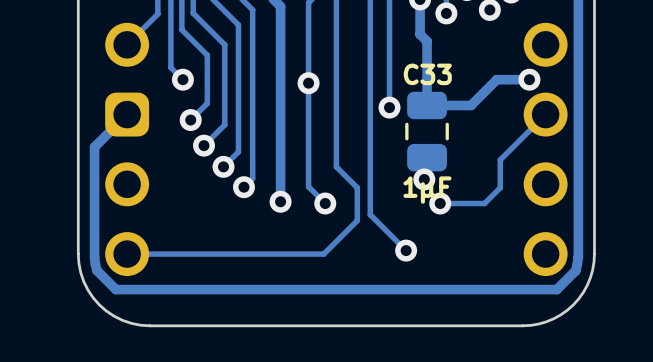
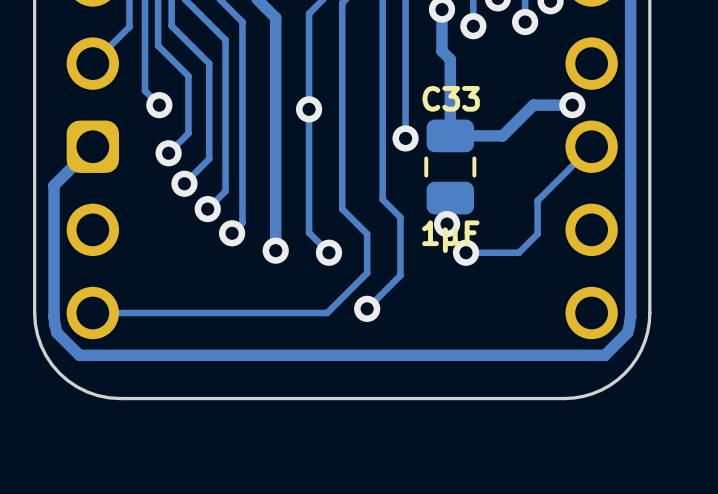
track: (370, 158) (370, 214) (406, 250) -> (382, 199) (400, 217) (400, 275) (367, 308)
via position: (406, 250) -> (367, 308)

